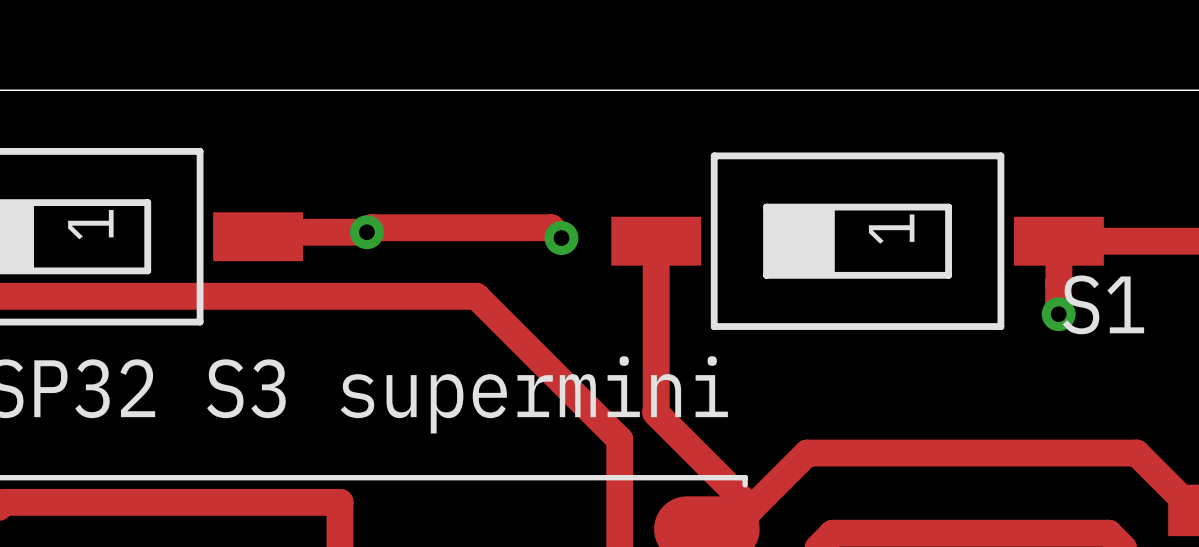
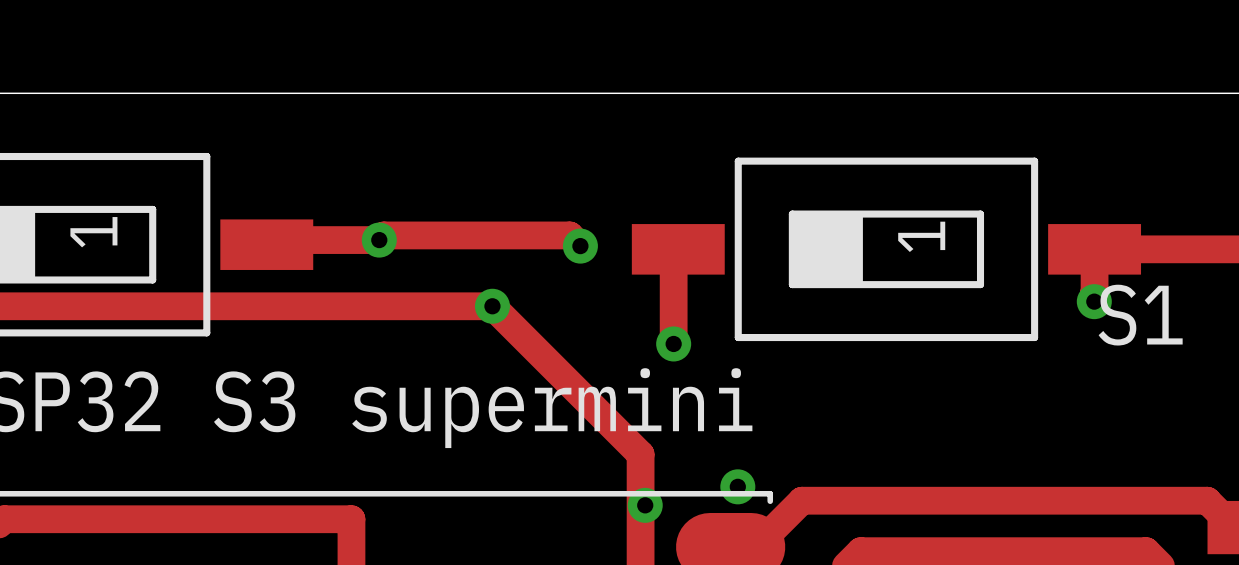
track: (656, 241) (655, 412) (751, 508) -> (678, 249) (673, 253) (673, 343)
via: none -> (492, 306)
via position: (1058, 314) -> (1094, 301)
via: none -> (673, 343)
via: none -> (737, 486)
track: (775, 484) (807, 453) (1136, 453) (1167, 484) -> (801, 500) (1207, 500)
via: none -> (645, 505)

